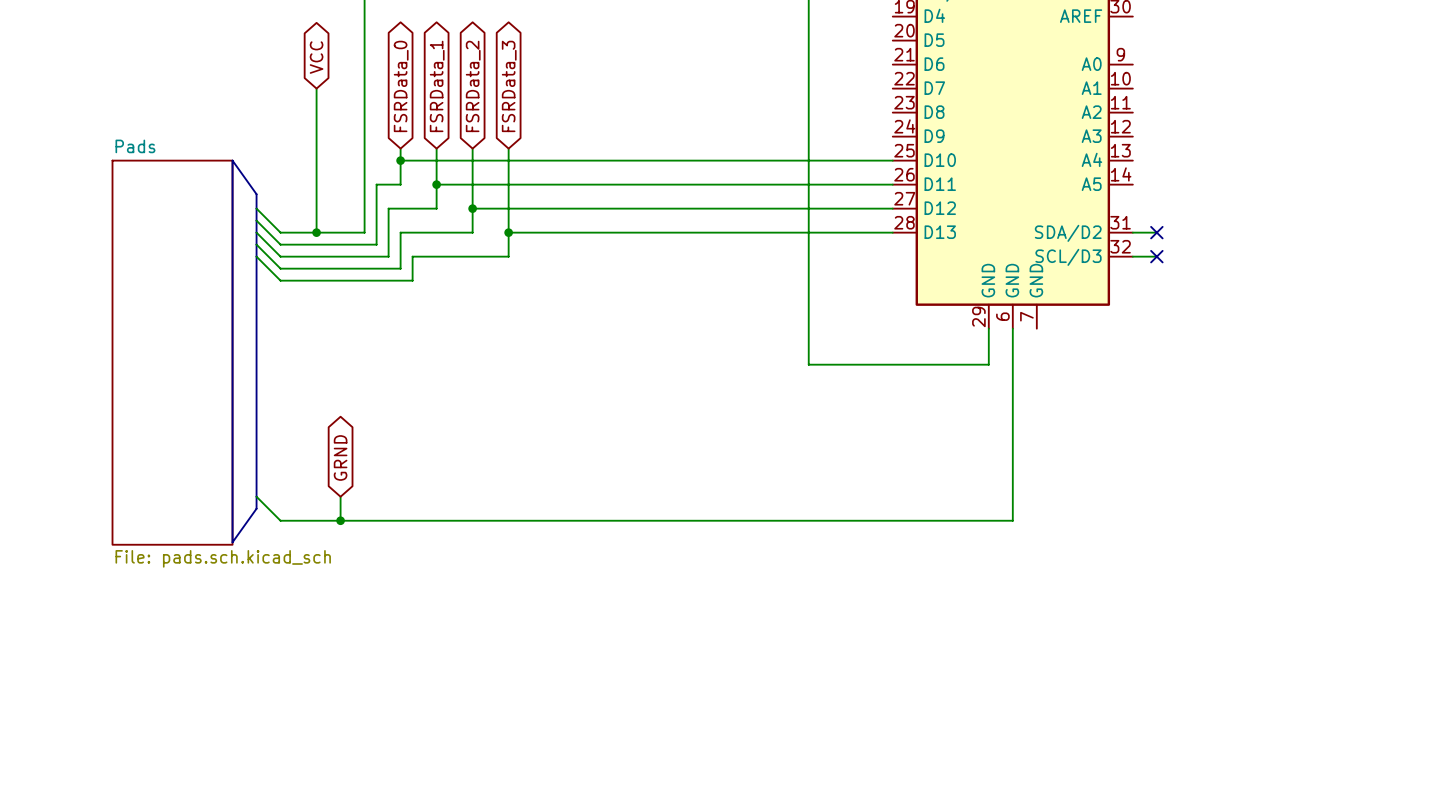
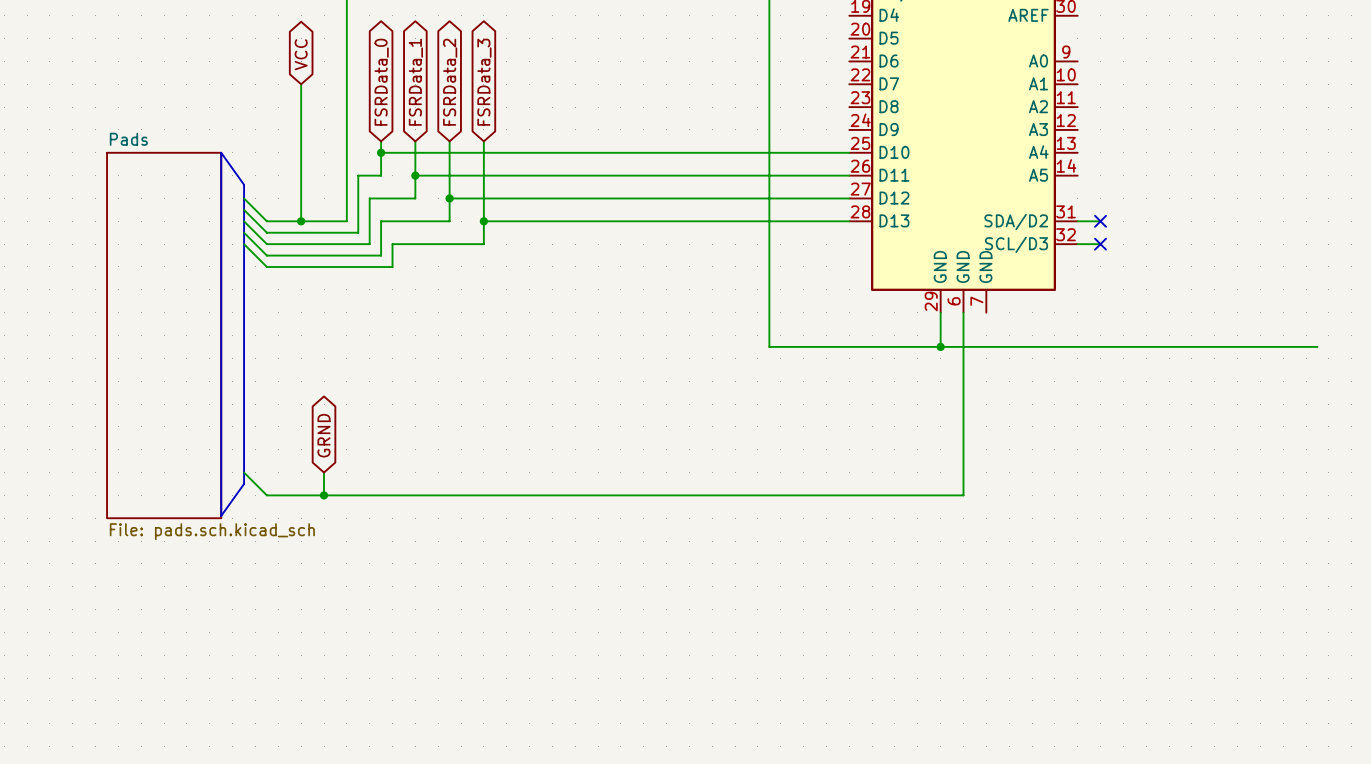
wire: none -> (940, 346) (1317, 346)
junction: none -> (940, 346)

